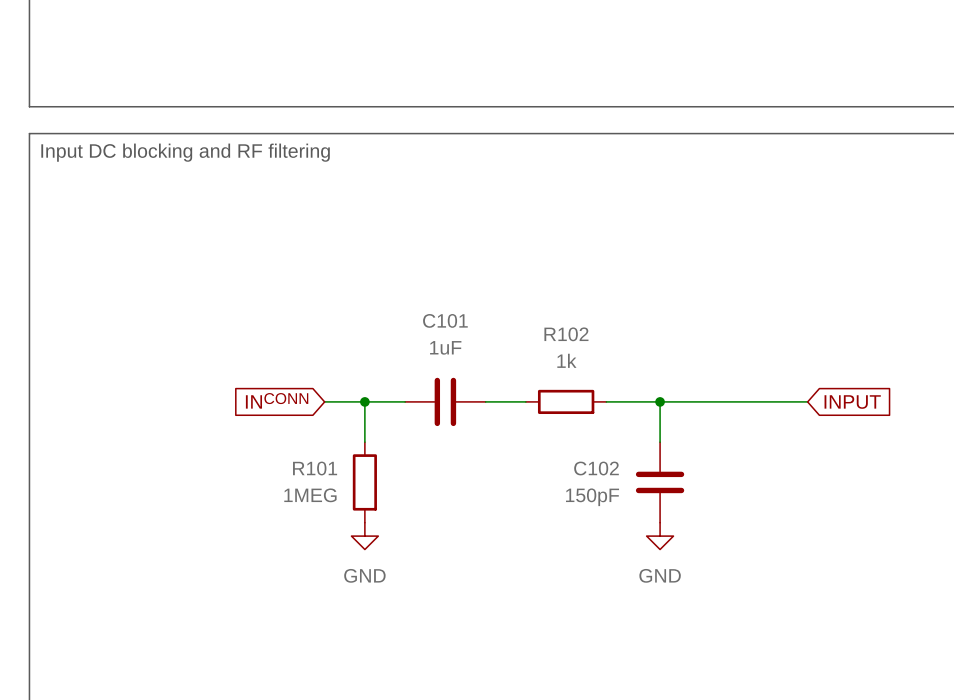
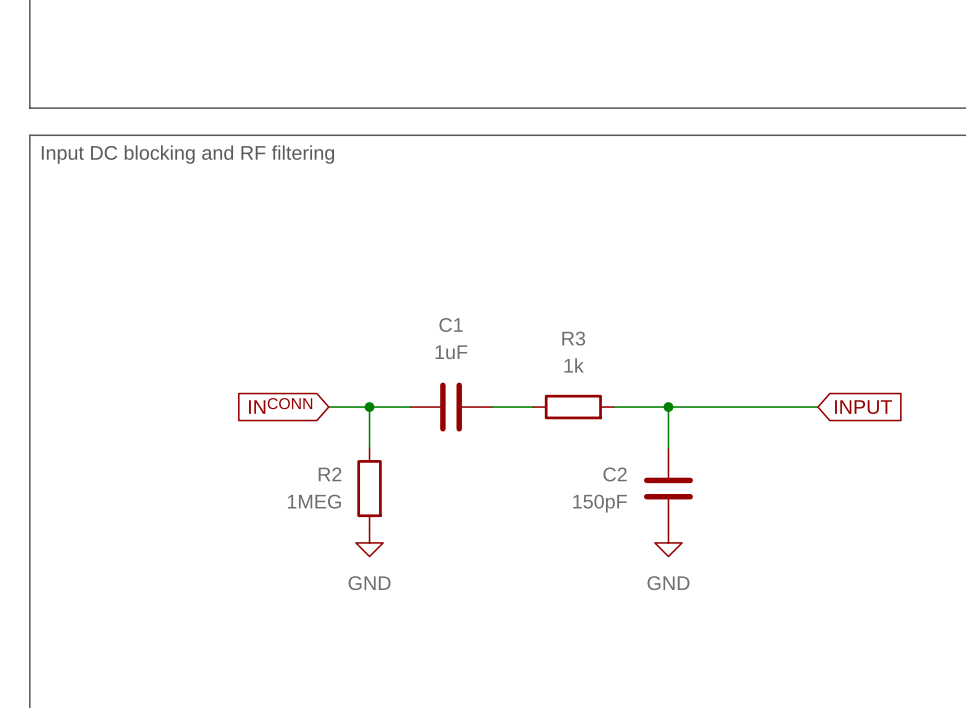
C101 name: C101 (445, 320) -> C1 (451, 325)
R102 name: R102 (566, 334) -> R3 (573, 338)
R101 name: R101 (315, 468) -> R2 (330, 474)
C102 name: C102 (596, 468) -> C2 (615, 474)

